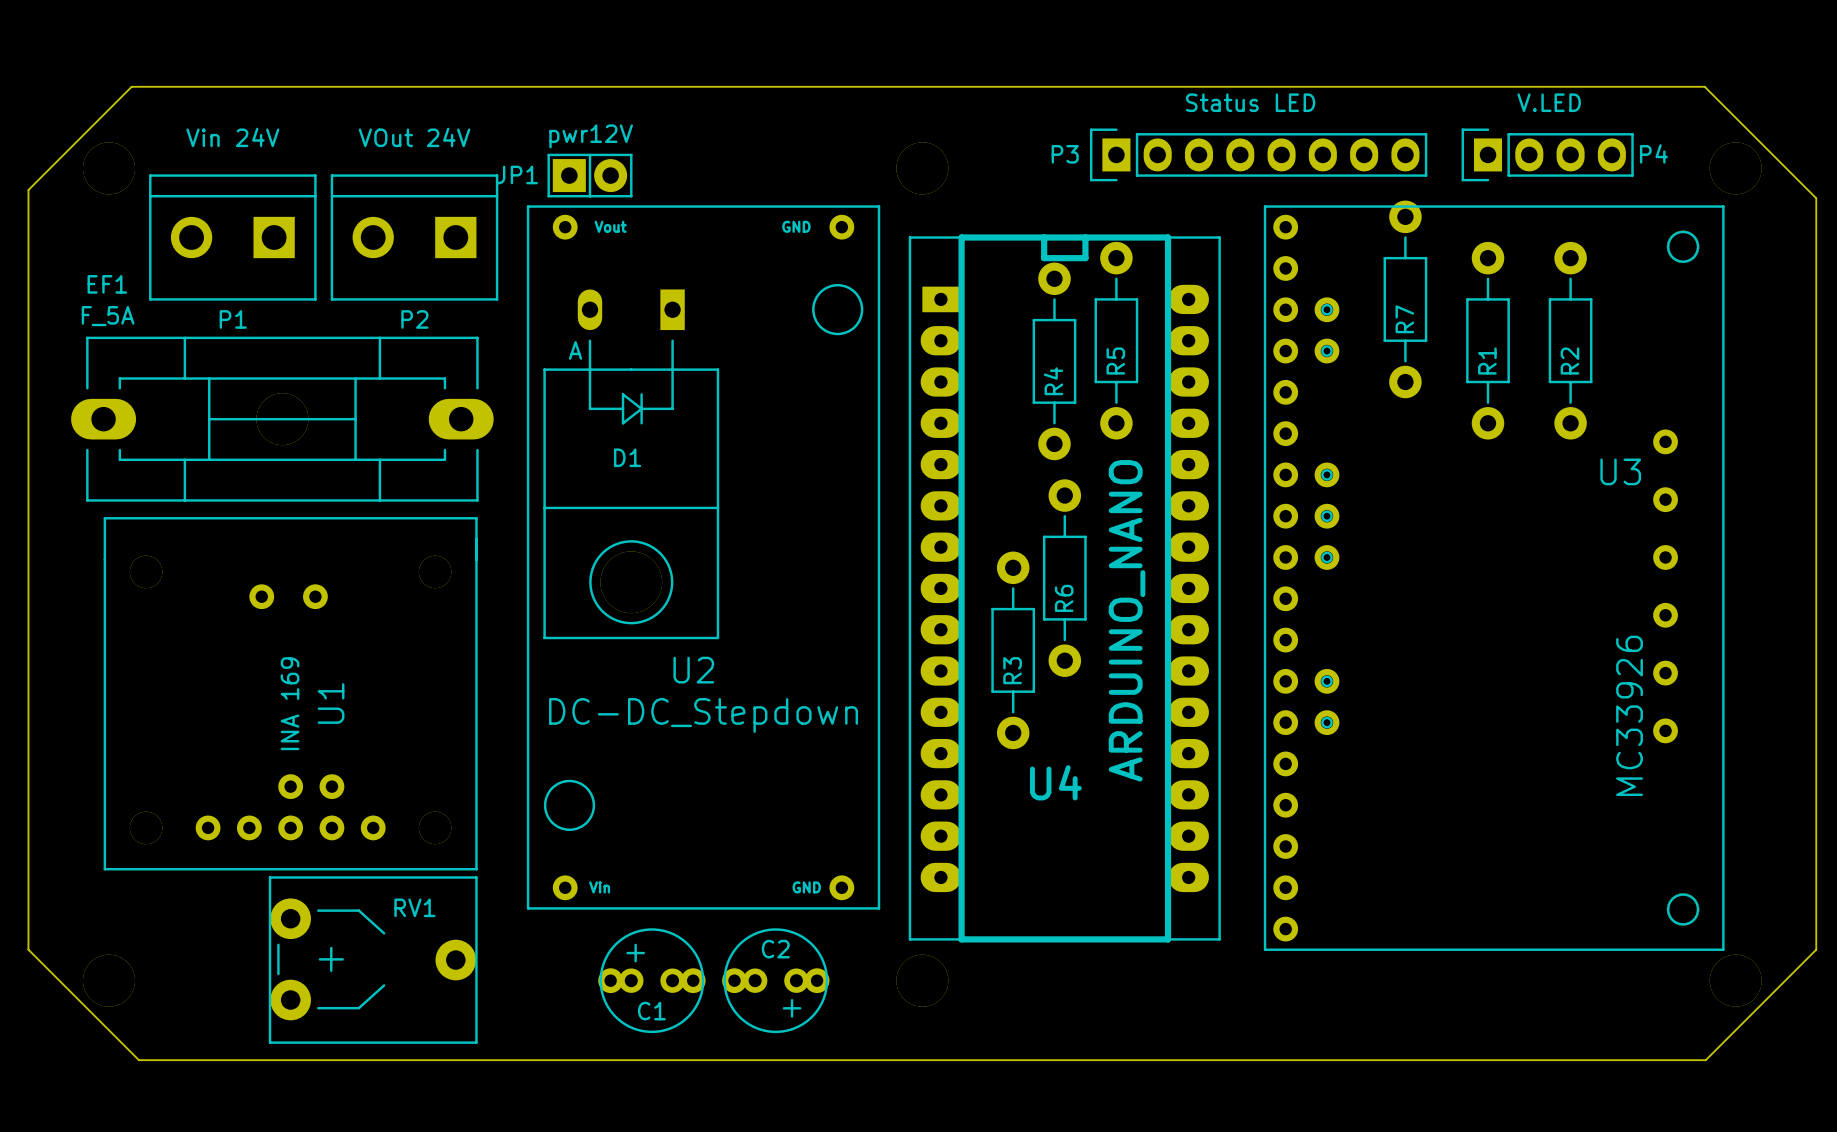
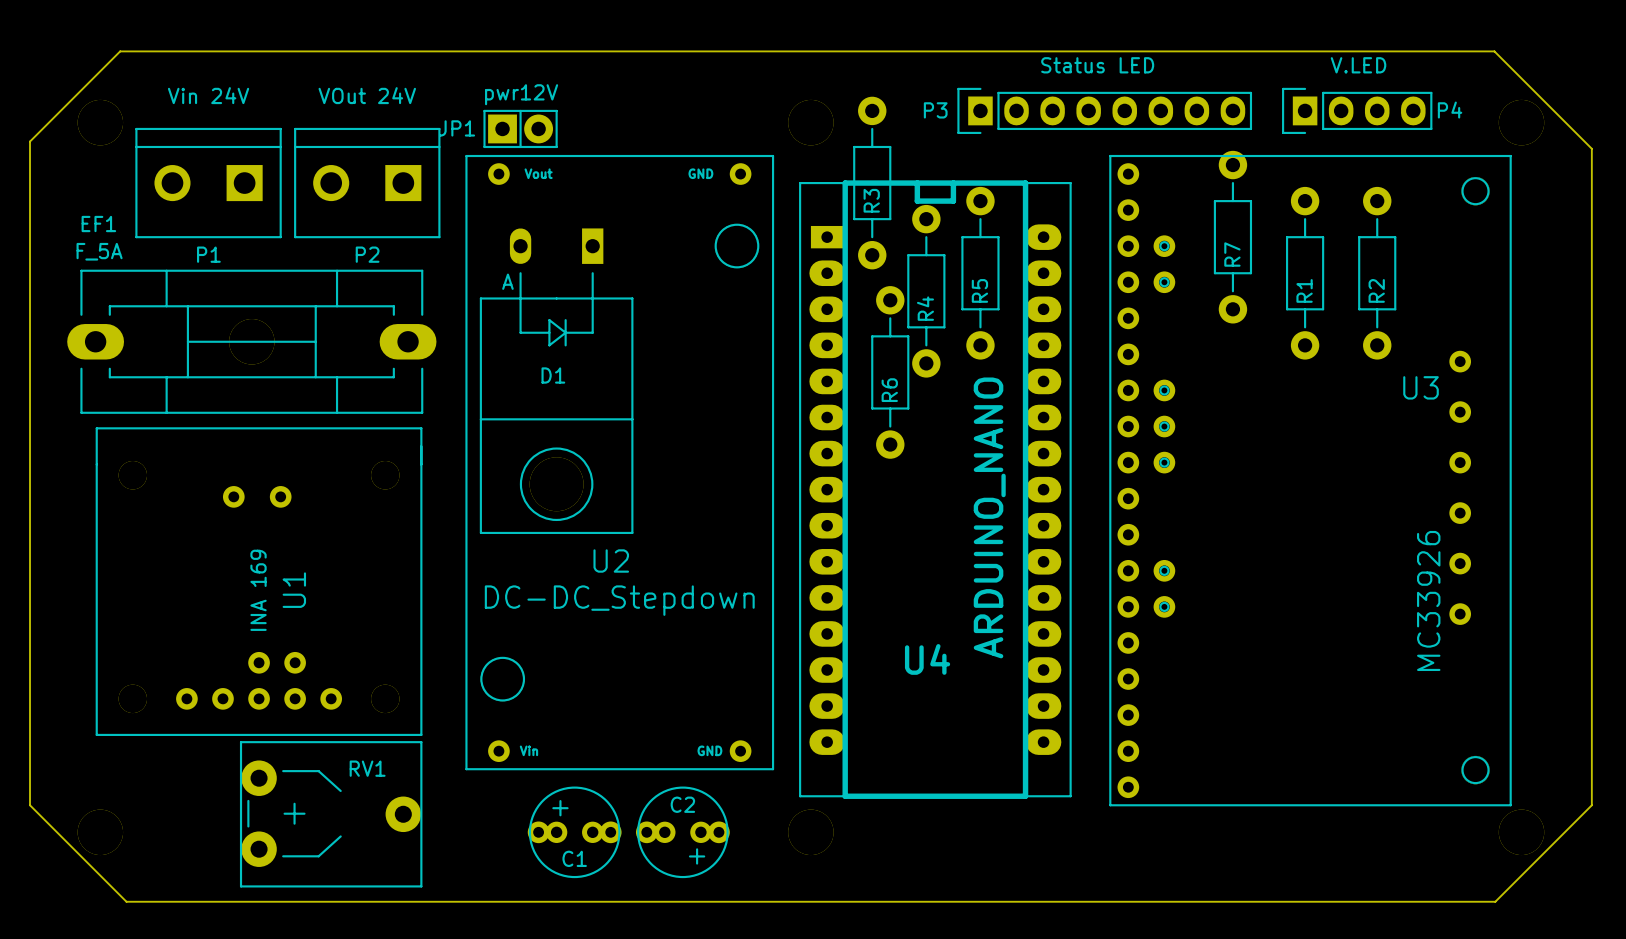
R6 position: (1064, 578) -> (890, 372)
R3 position: (1013, 650) -> (872, 183)

